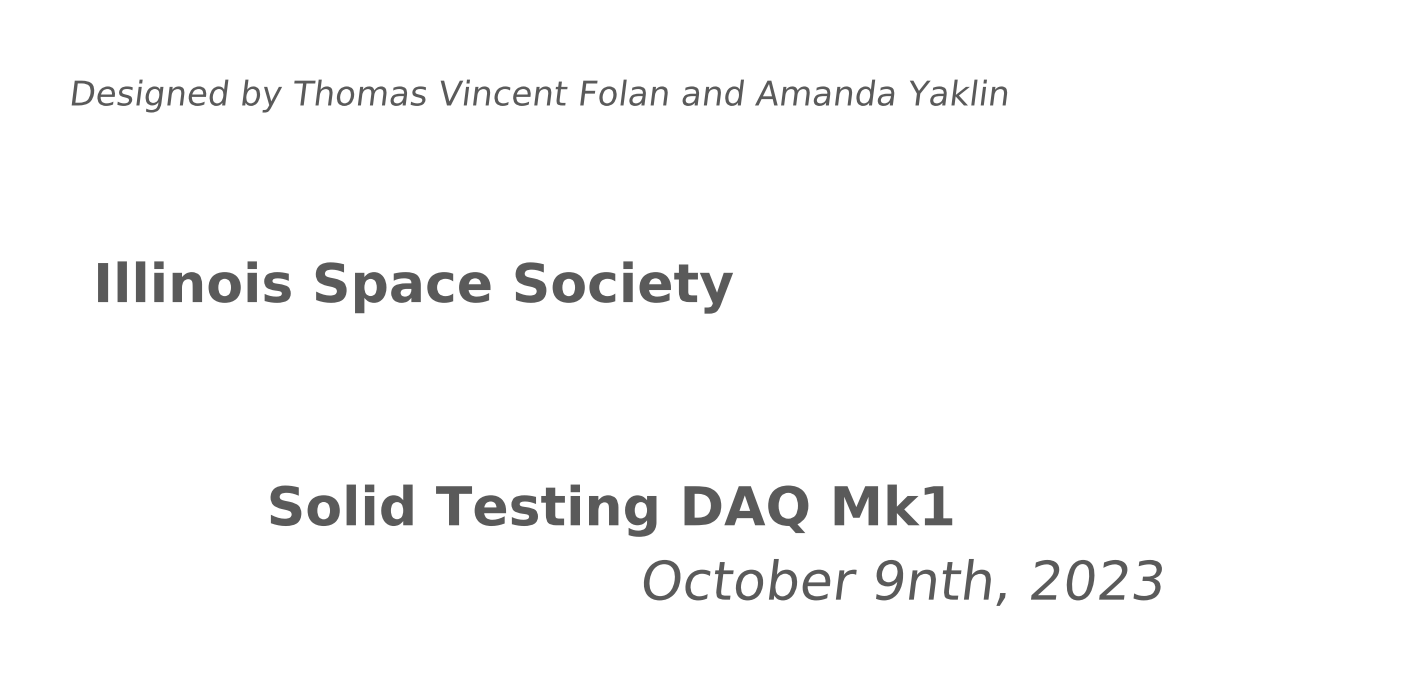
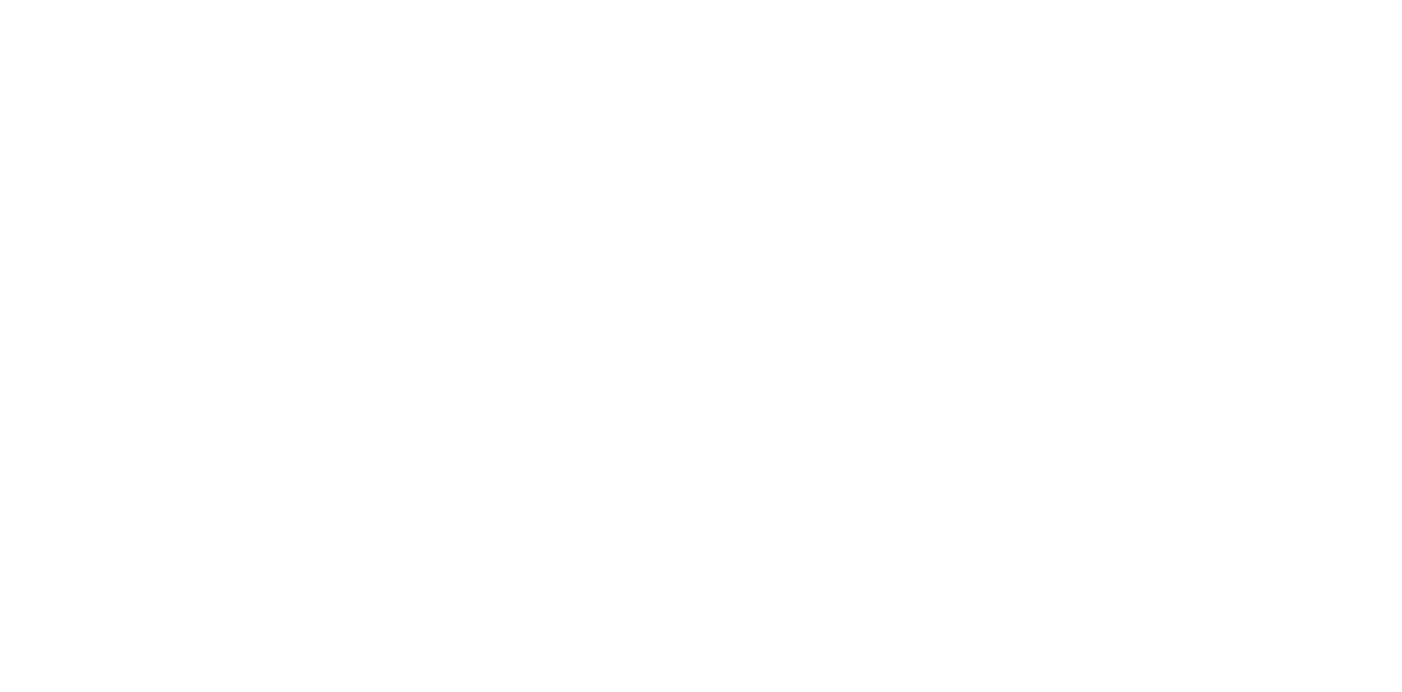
text: Designed by Thomas Vincent Folan and Amanda Yaklin (539, 96) -> none
text: Illinois Space Society (415, 287) -> none
text: Solid Testing DAQ Mk1 (611, 510) -> none
text: October 9nth, 2023 (902, 582) -> none

